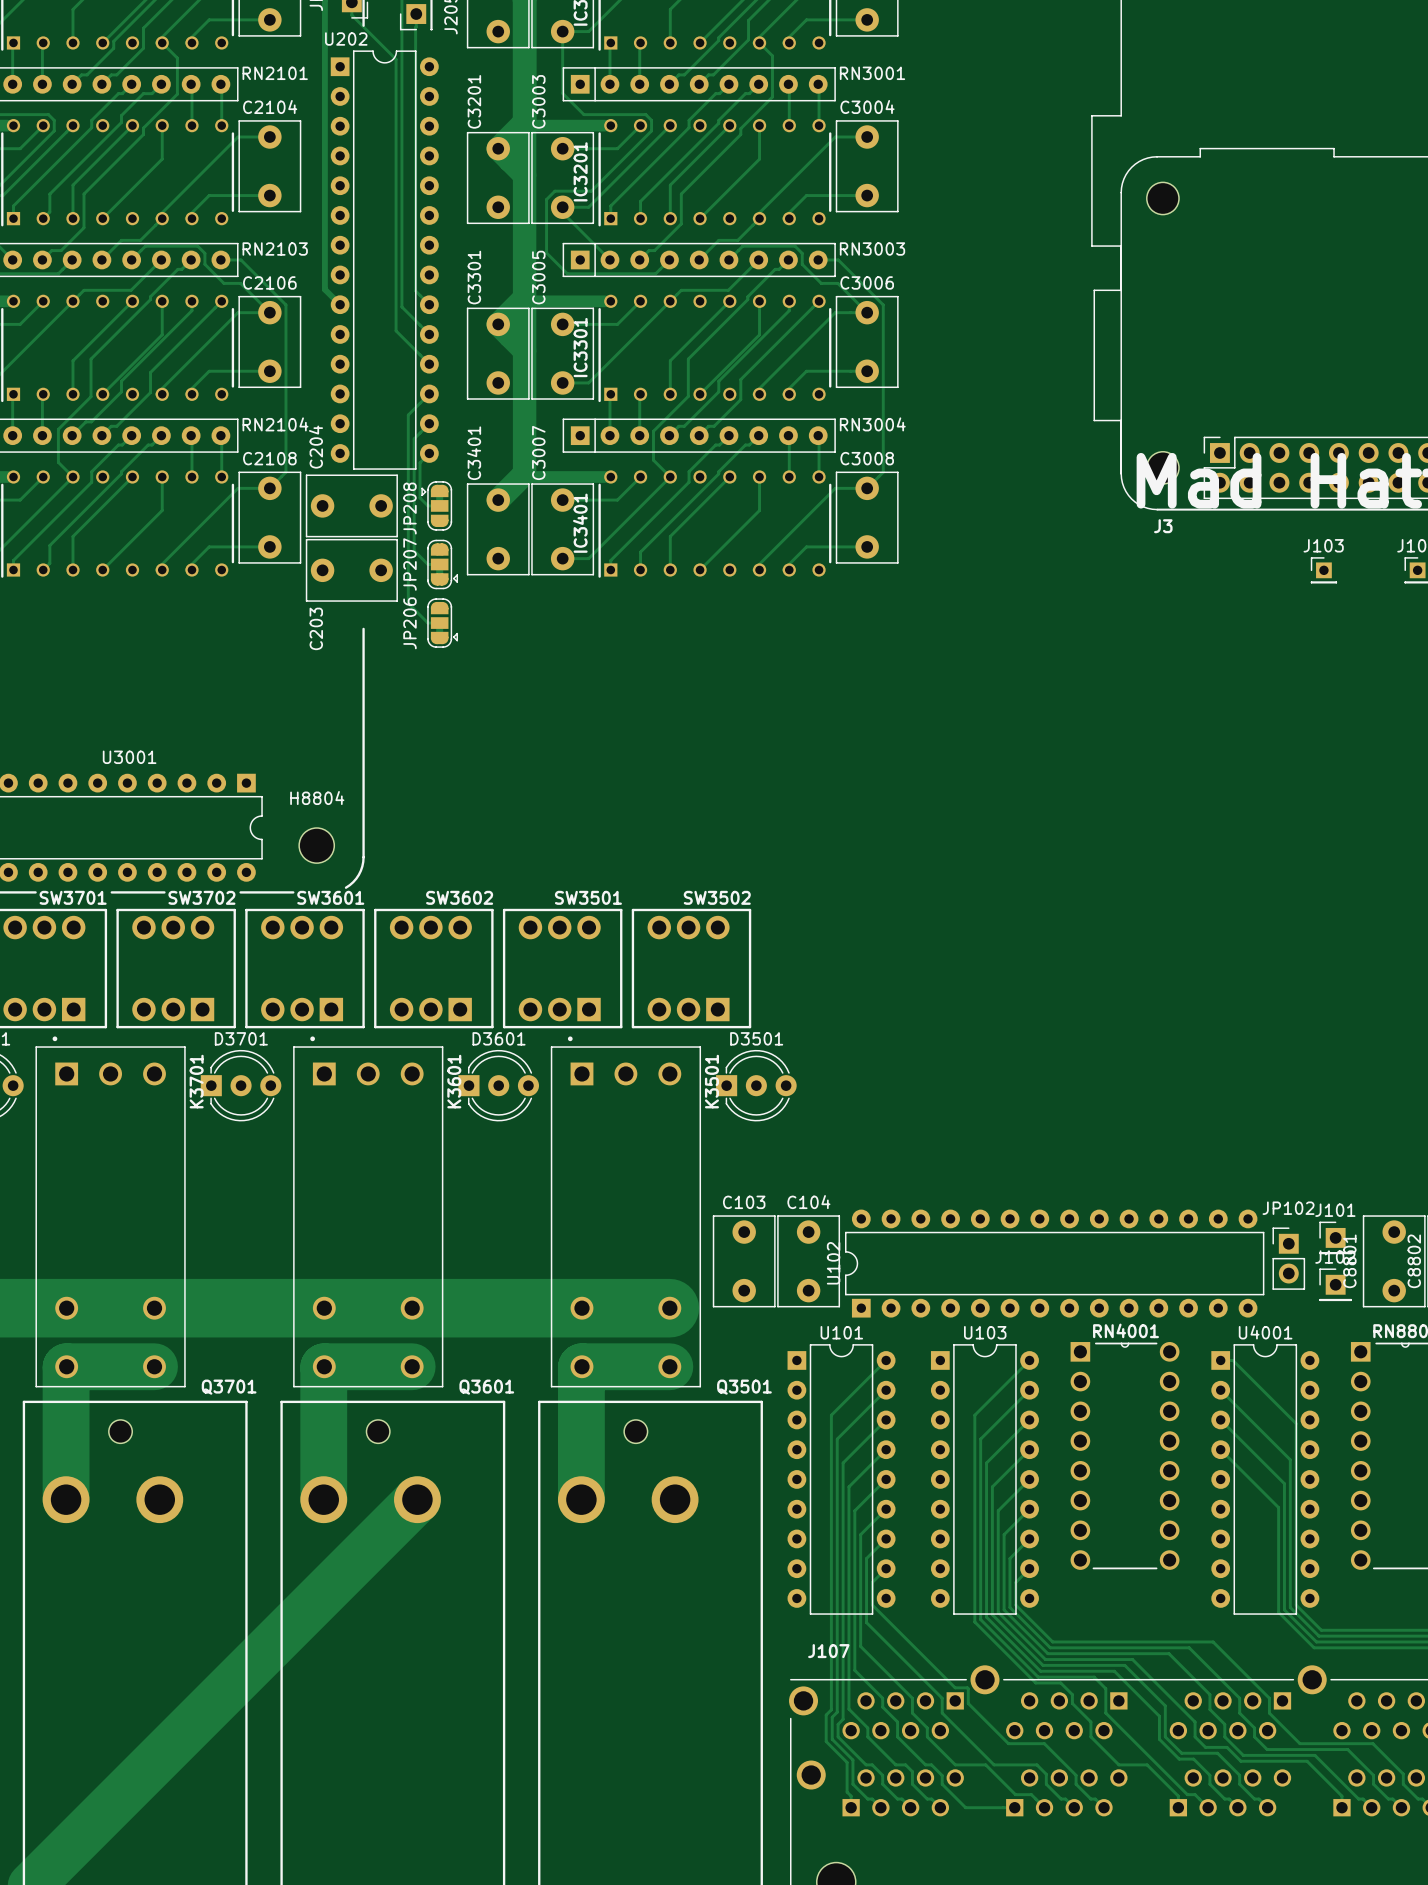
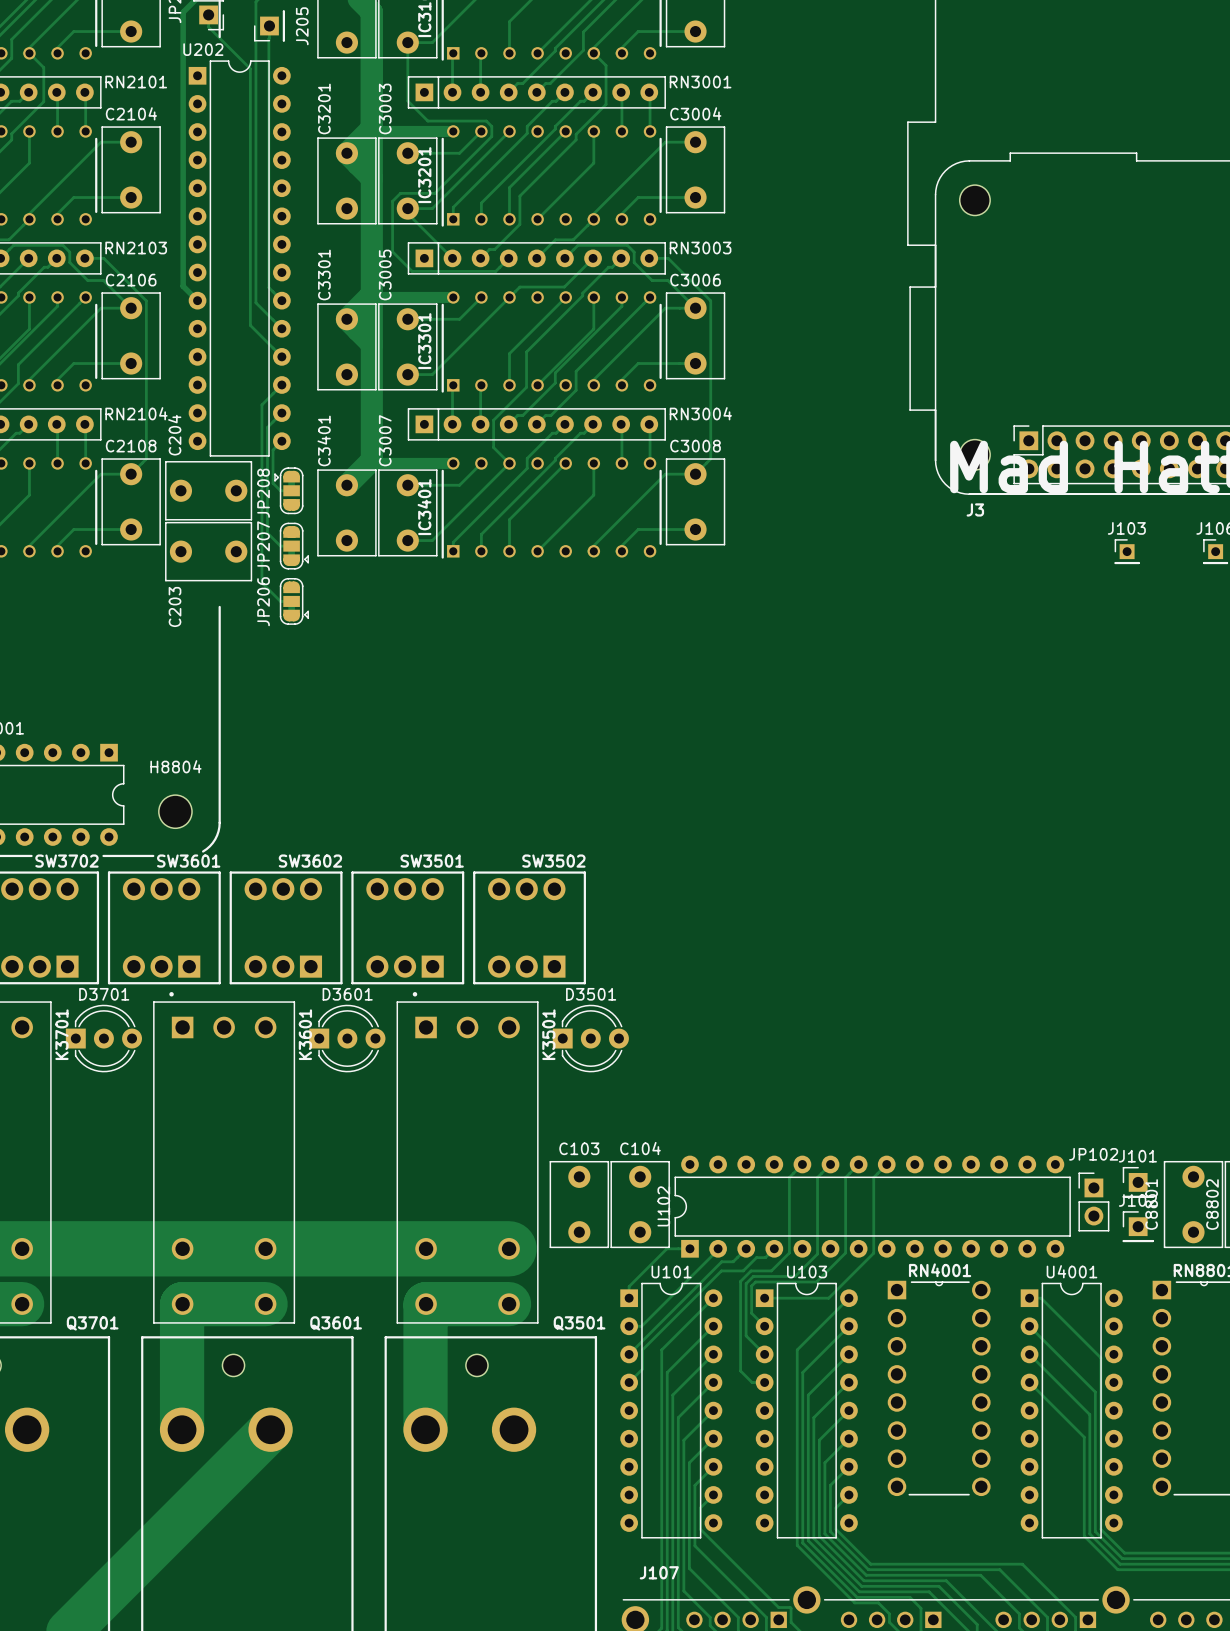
track: none -> (802, 1164) (789, 1177) (789, 1252) (771, 1270) (751, 1270) (740, 1281) (740, 1370) (752, 1382) (764, 1382)
track: none -> (830, 1164) (817, 1177) (817, 1254) (795, 1276) (753, 1276) (746, 1283) (746, 1335) (764, 1354)
track: none -> (858, 1164) (845, 1177) (845, 1252) (816, 1282) (755, 1282) (751, 1286) (751, 1313) (764, 1326)
track: none -> (886, 1164) (873, 1177) (873, 1253) (828, 1298) (764, 1298)
track: none -> (689, 1248) (666, 1248) (629, 1286) (629, 1298)
track: none -> (718, 1248) (641, 1326) (629, 1326)
track: none -> (746, 1248) (733, 1261) (721, 1261) (629, 1354)
track: none -> (774, 1248) (765, 1257) (756, 1257) (743, 1270) (721, 1270) (642, 1349) (642, 1369) (629, 1382)

